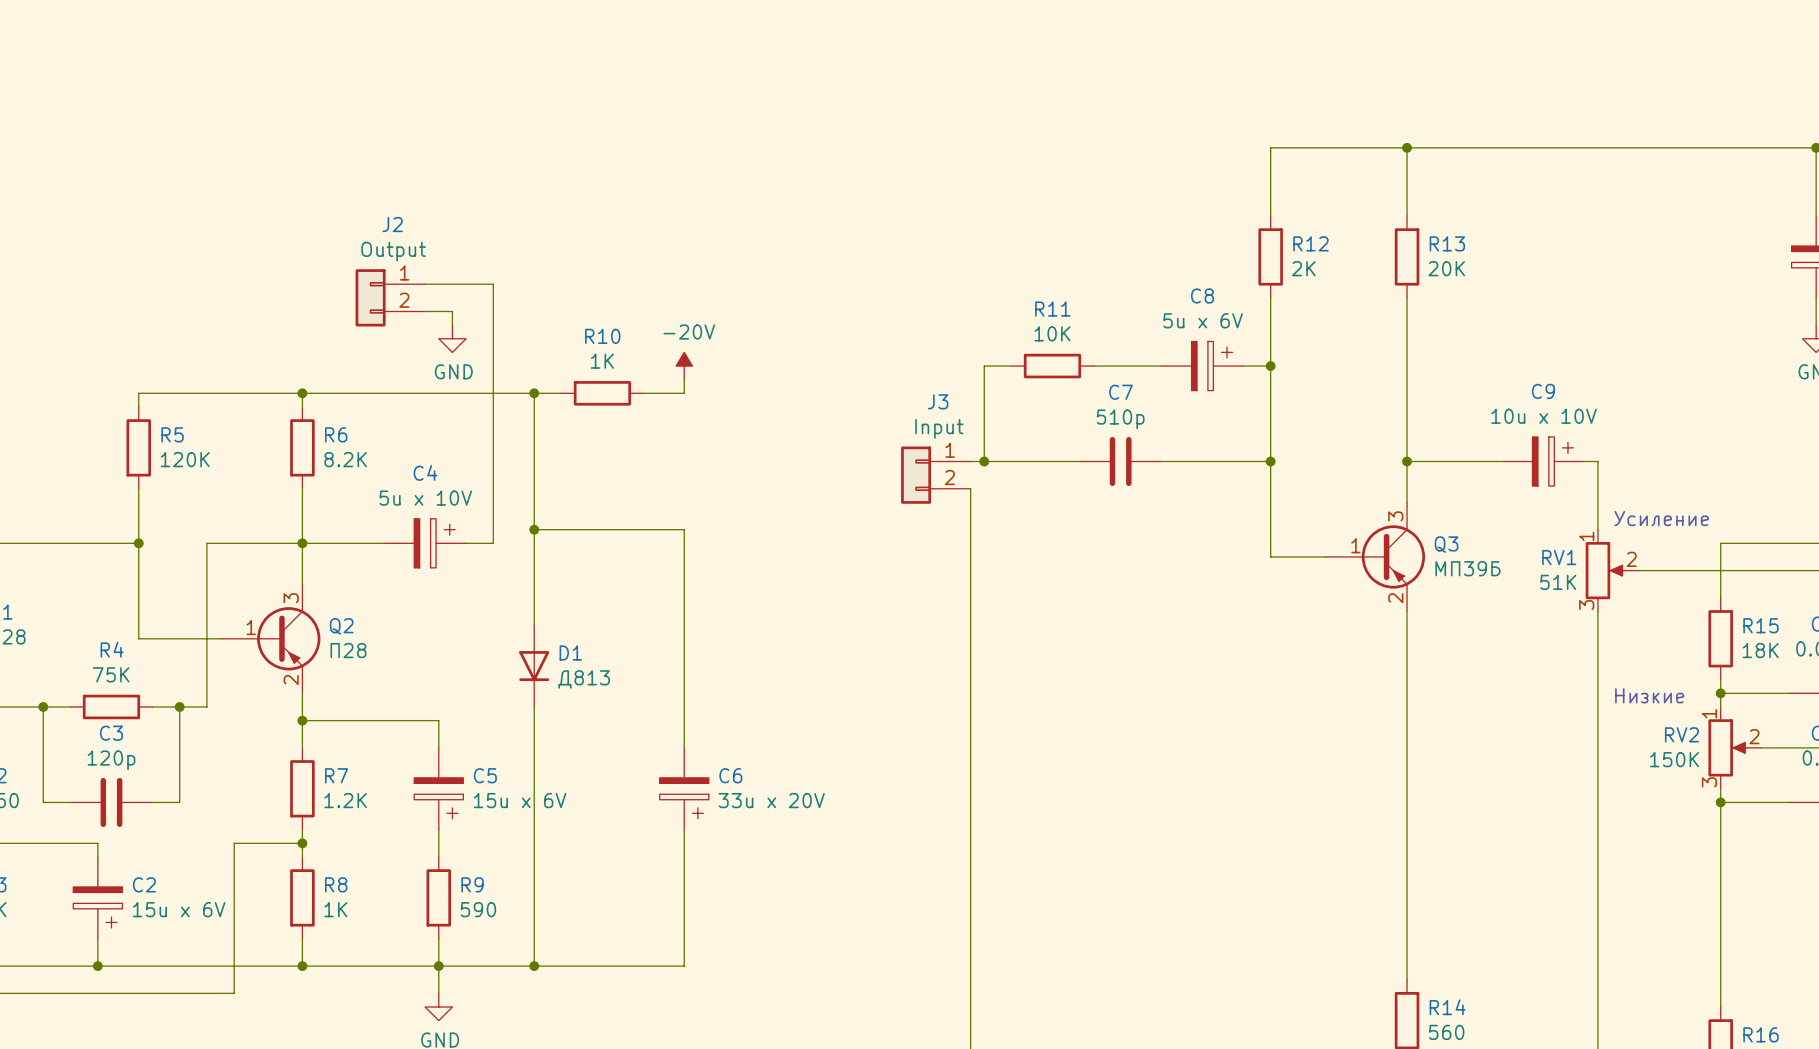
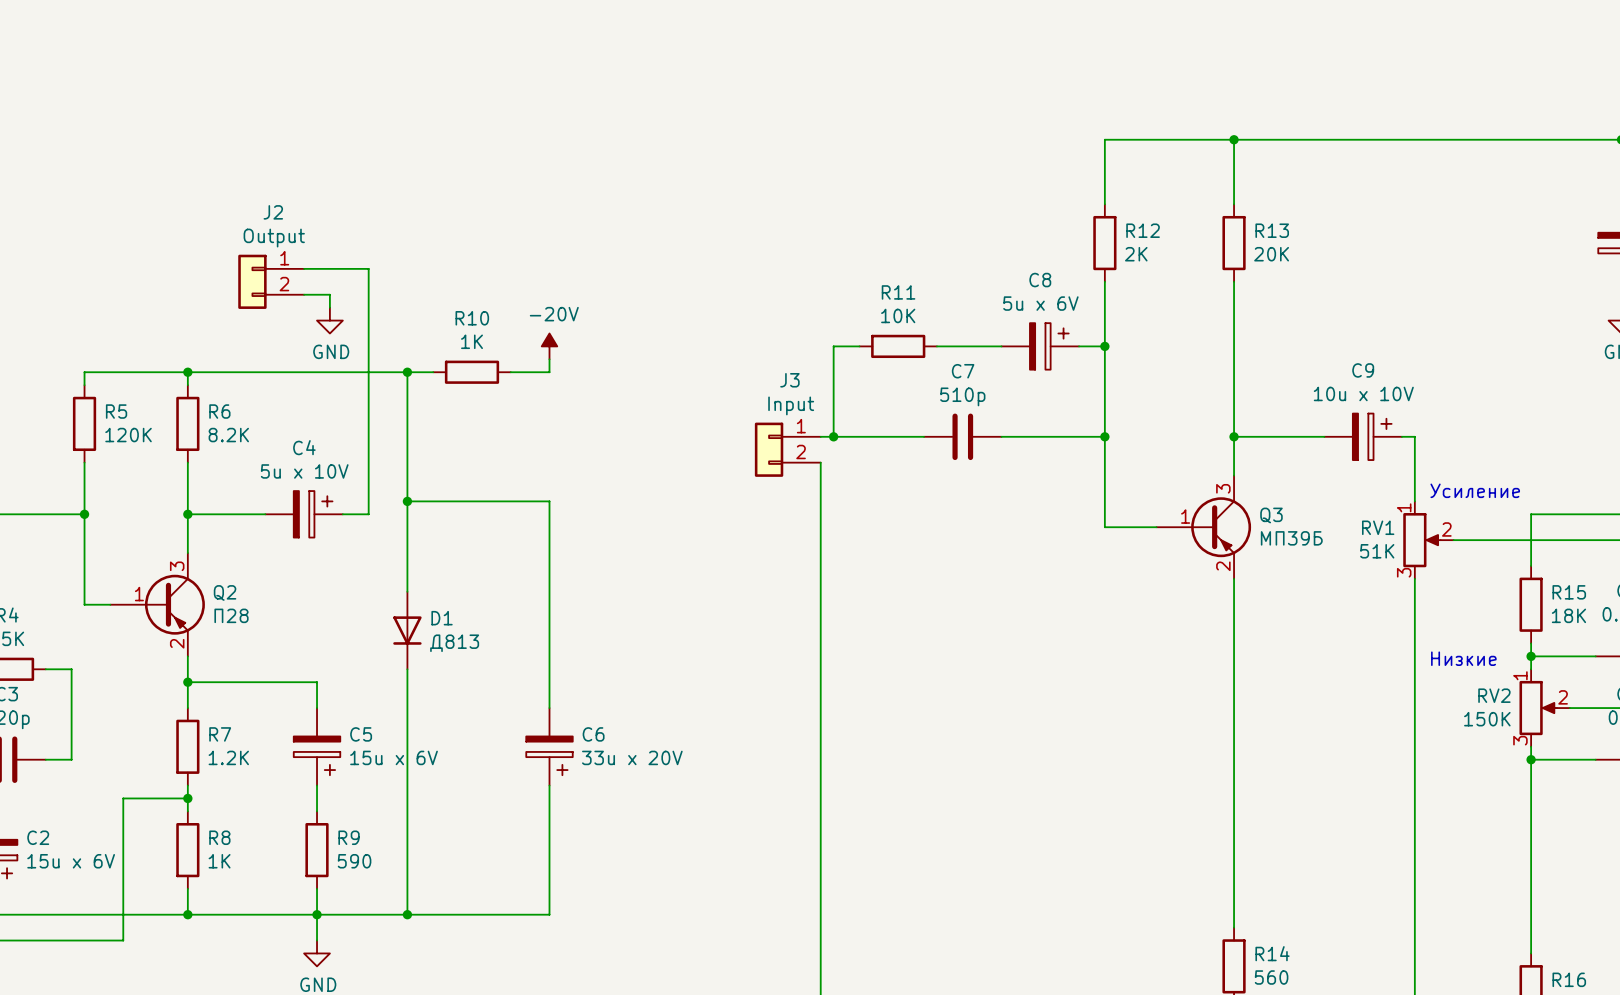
wire: (193, 393) (138, 393) (138, 406) -> (84, 372) (84, 385)
R5 position: (138, 447) -> (84, 423)
wire: (138, 488) (138, 638) (193, 638) -> (84, 462) (84, 604)
wire: none -> (32, 514) (84, 514)
junction position: (138, 543) -> (84, 514)
wire: (302, 543) (206, 543) (206, 706) (179, 706) -> none
junction: (179, 706) -> none

